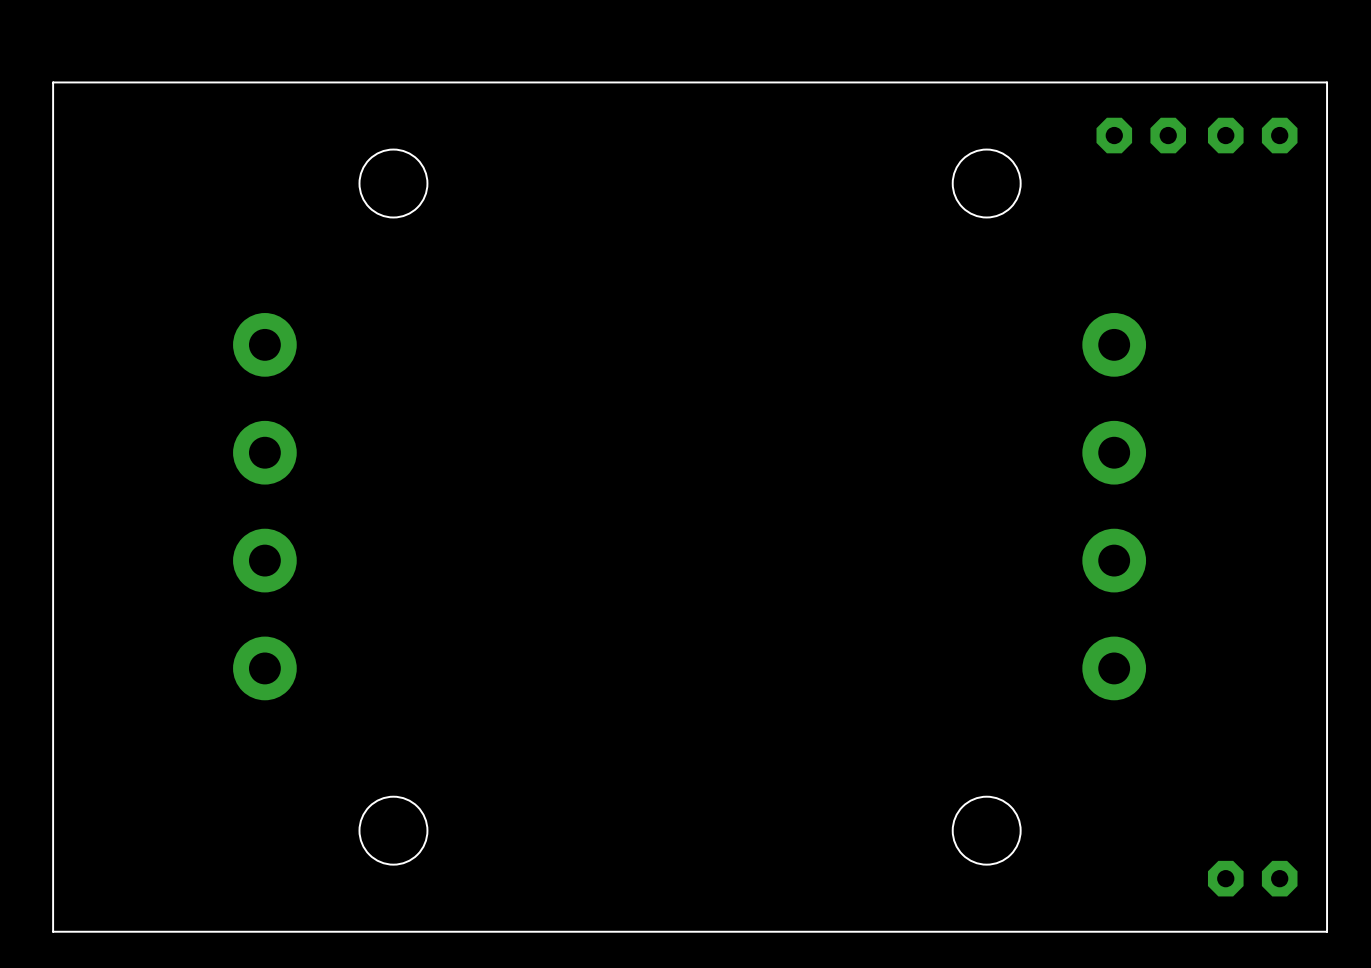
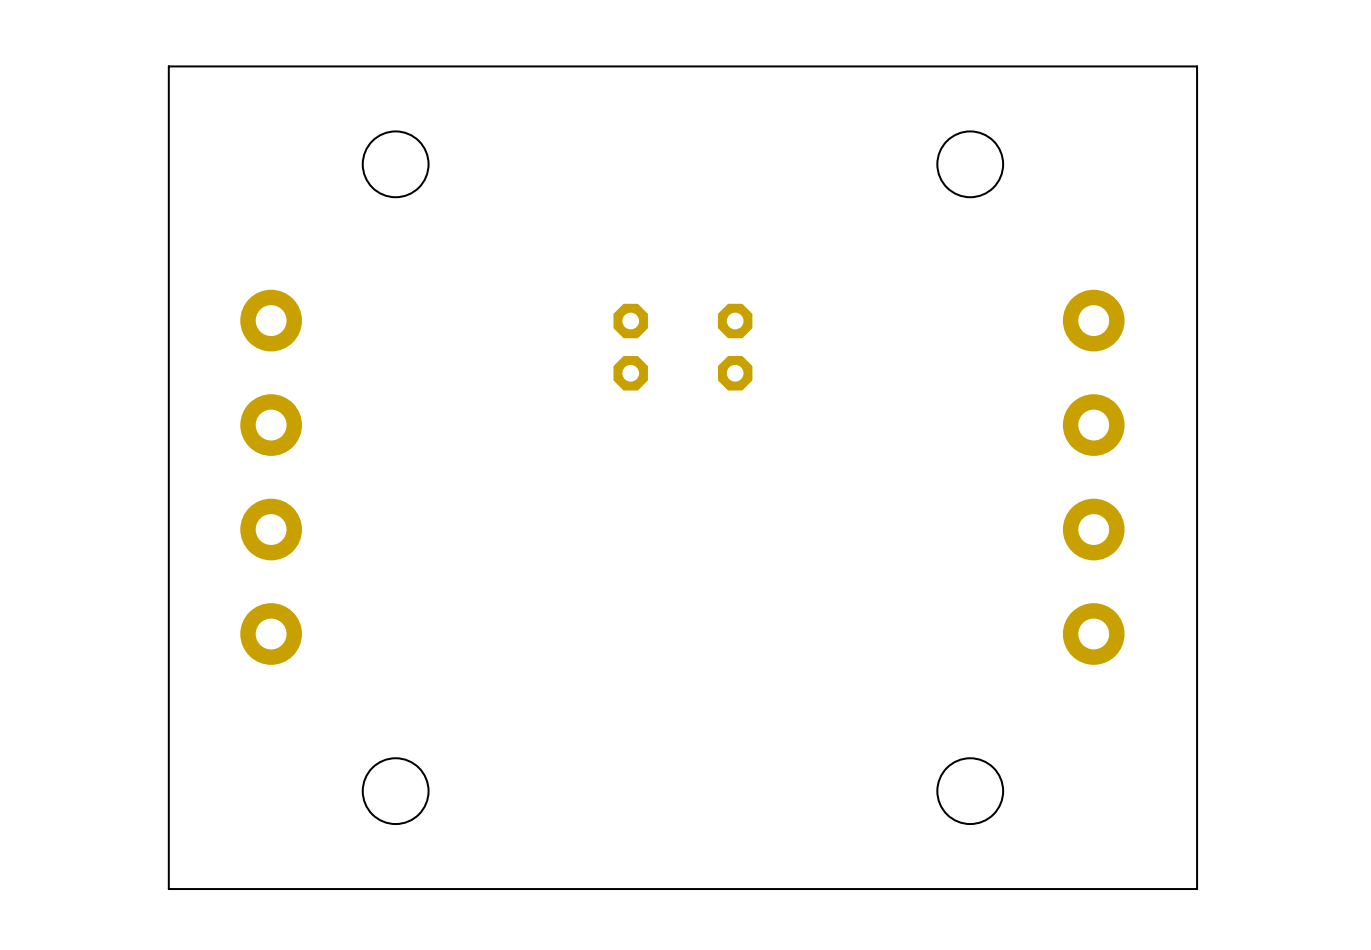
board edge: (159, 82) (53, 82) (53, 931) (159, 931) -> (168, 66) (168, 889)
board edge: (1220, 82) (1327, 82) (1327, 931) (1220, 931) -> (1197, 66) (1197, 889)
part: (1141, 135) -> none
part: (1252, 135) -> none
part: none -> (630, 347)
part: none -> (735, 347)
part: (1252, 878) -> none

